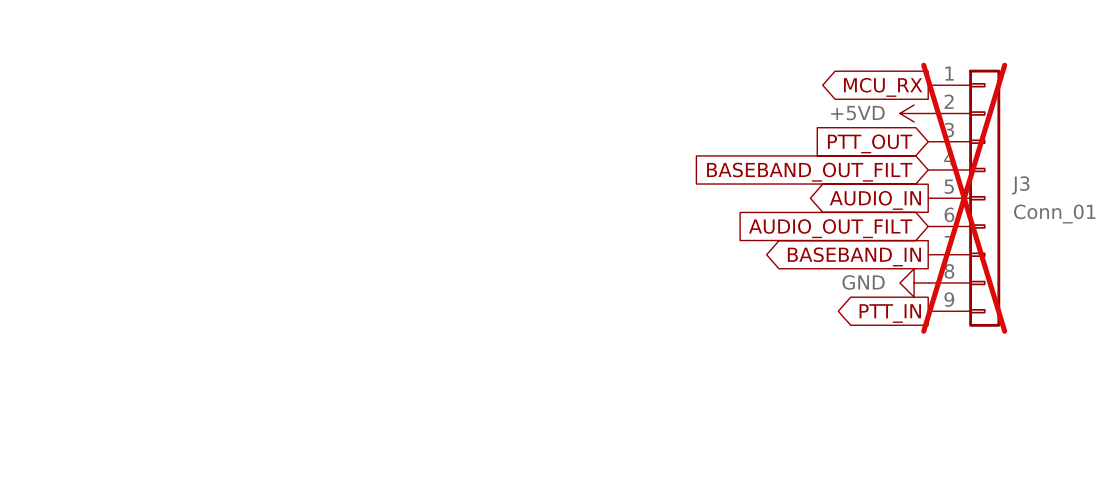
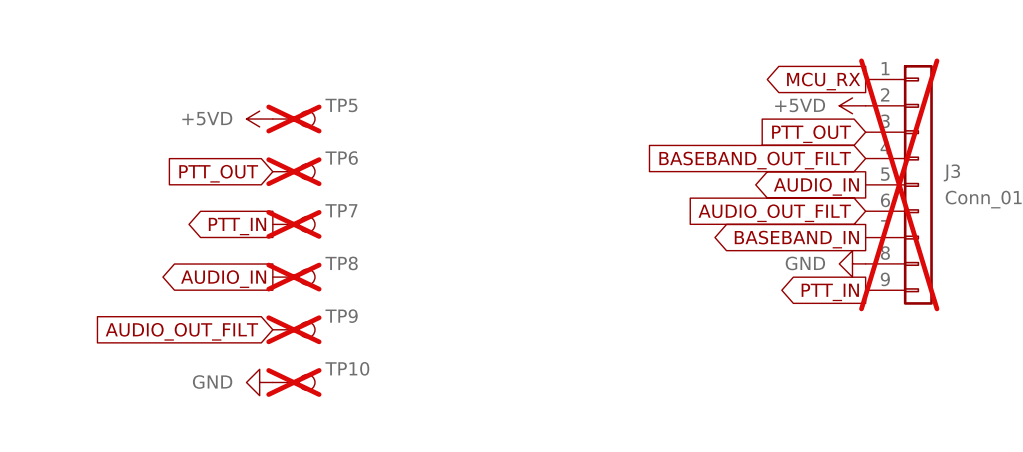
power symbol: none -> +5VD (259, 119)
TP5: none -> (293, 119)
TP6: none -> (293, 171)
global label: none -> PTT_OUT (218, 173)
TP7: none -> (293, 224)
global label: none -> PTT_IN (237, 226)
TP8: none -> (293, 277)
global label: none -> AUDIO_IN (223, 279)
TP9: none -> (293, 329)
global label: none -> AUDIO_OUT_FILT (181, 331)
power symbol: none -> GND (259, 382)
TP10: none -> (293, 382)

